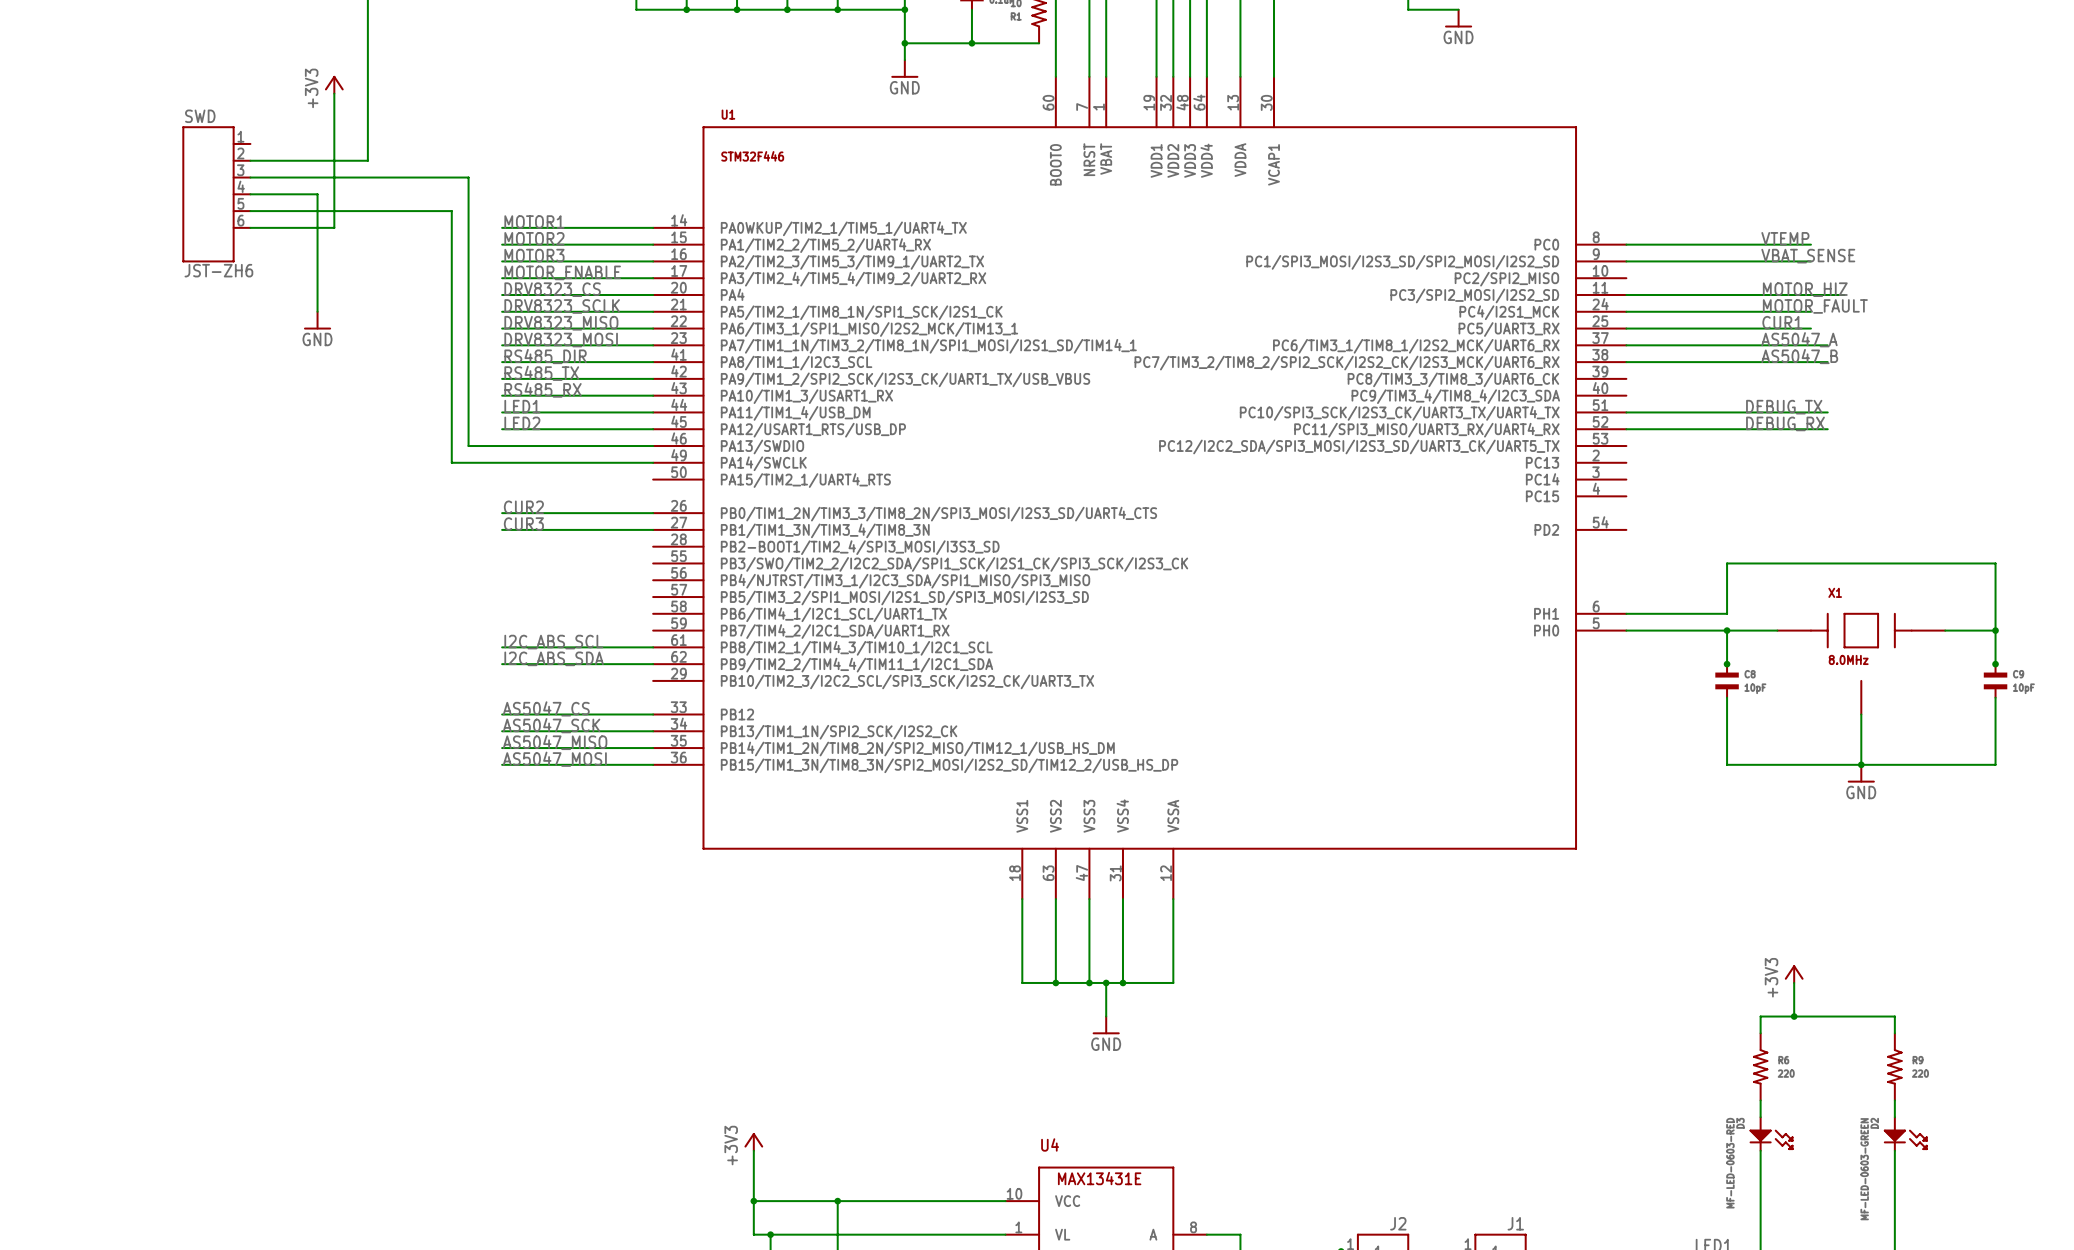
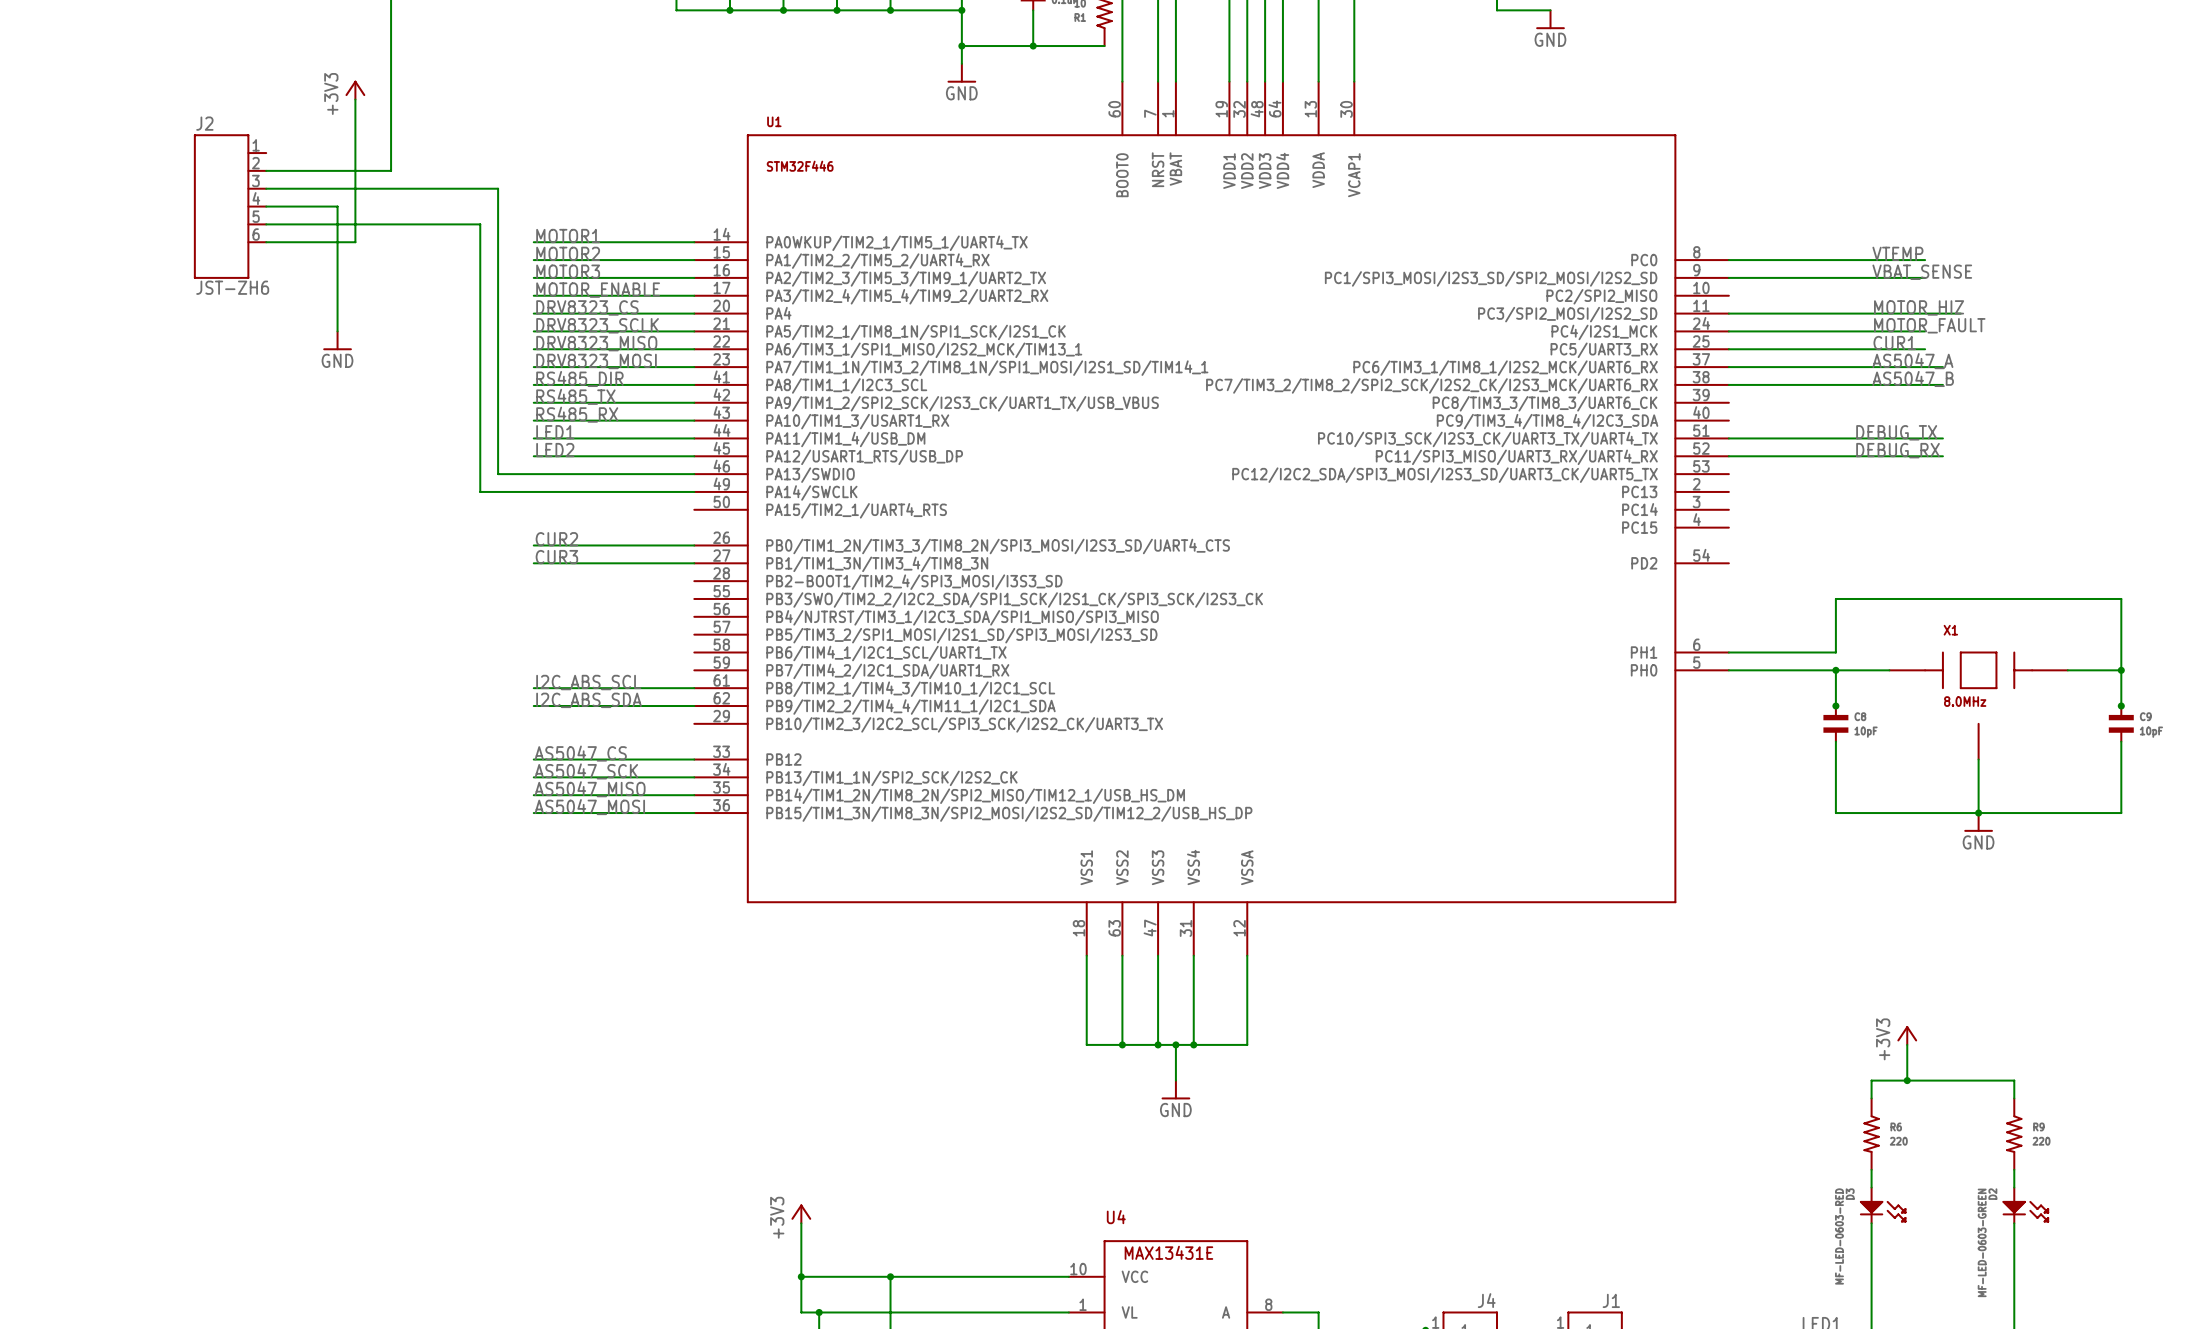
SWD name: SWD (200, 116) -> J2 (204, 123)
J2 name: J2 (1398, 1223) -> J4 (1486, 1300)

